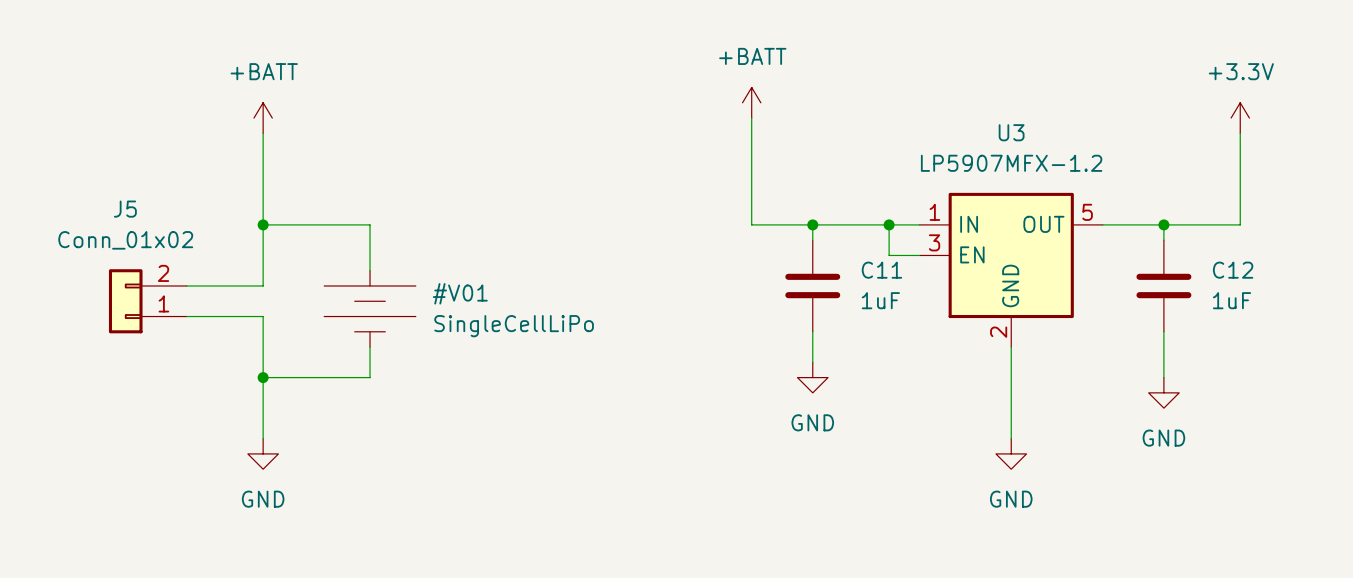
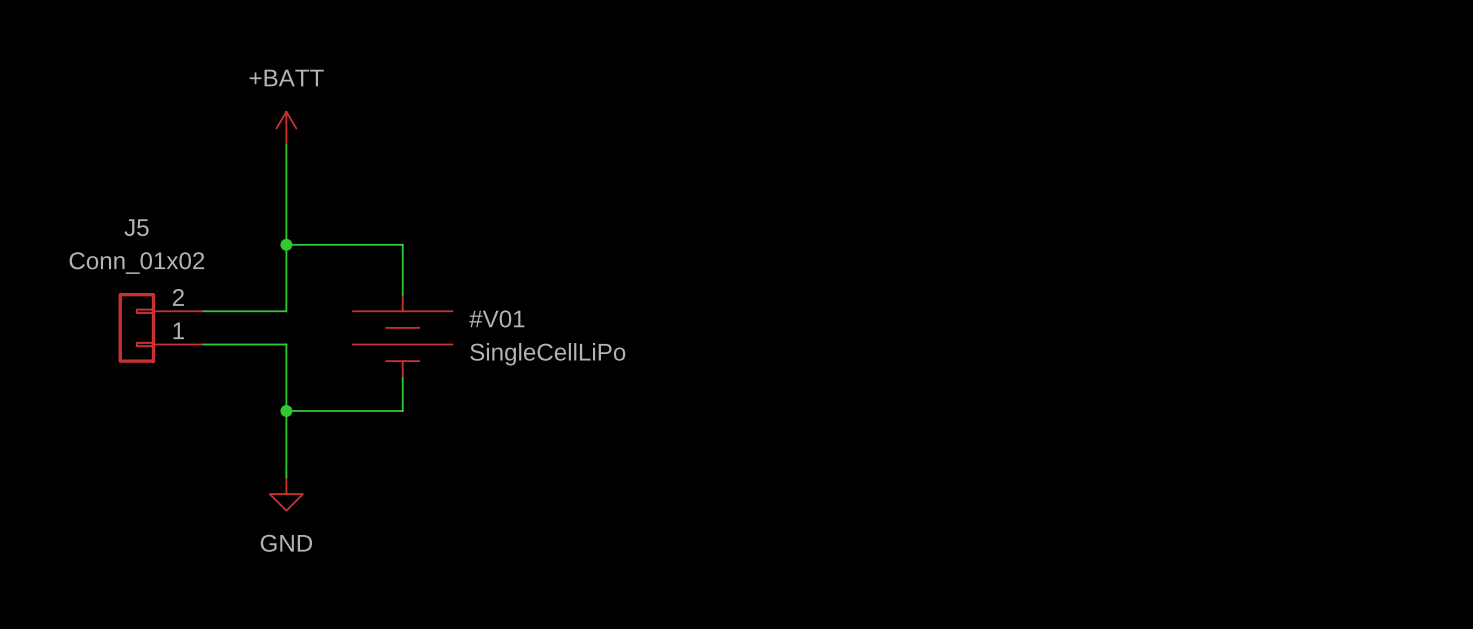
power symbol: +BATT (751, 102) -> none
wire: (751, 118) (751, 224) (919, 224) -> none
power symbol: +3.3V (1240, 118) -> none
wire: (1240, 133) (1240, 224) (1102, 224) -> none
wire: (812, 224) (812, 240) -> none
junction: (812, 224) -> none
wire: (889, 224) (889, 255) (919, 255) -> none
junction: (889, 224) -> none
wire: (1163, 224) (1163, 240) -> none
junction: (1163, 224) -> none
U3: LP5907MFX-1.2 (1011, 269) -> none
C11: 1uF (812, 286) -> none
C12: 1uF (1163, 286) -> none
wire: (812, 331) (812, 362) -> none
wire: (1163, 331) (1163, 377) -> none
wire: (1011, 347) (1011, 438) -> none
power symbol: GND (812, 377) -> none
power symbol: GND (1163, 392) -> none
power symbol: GND (1011, 453) -> none

